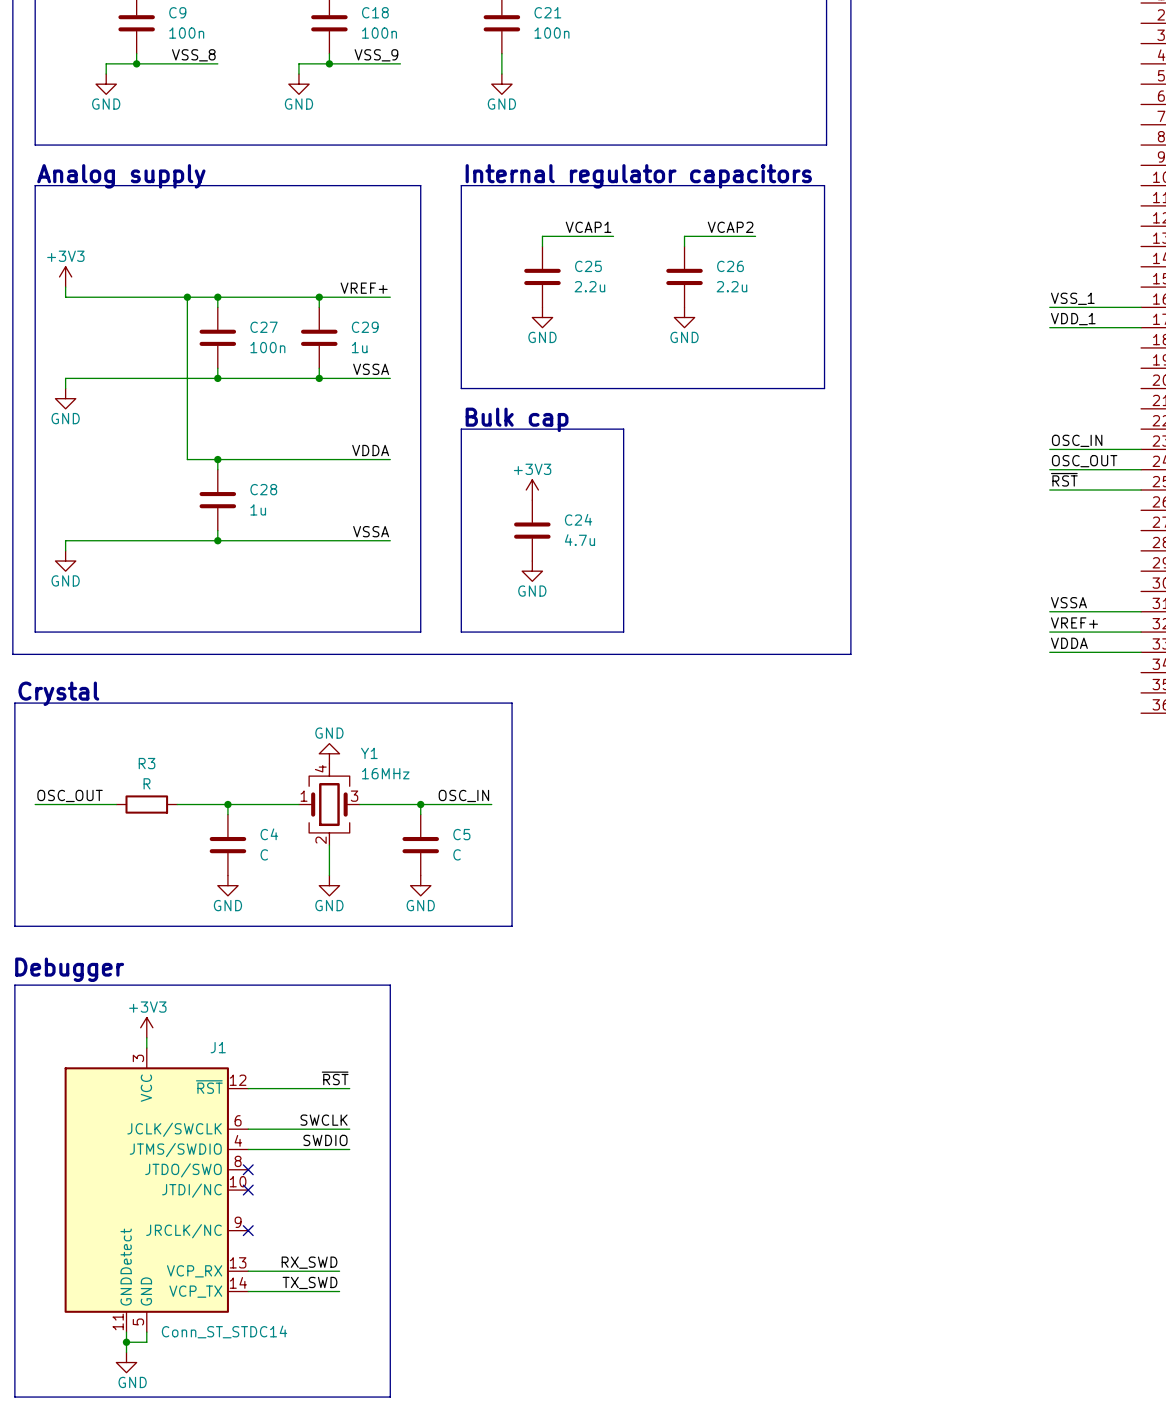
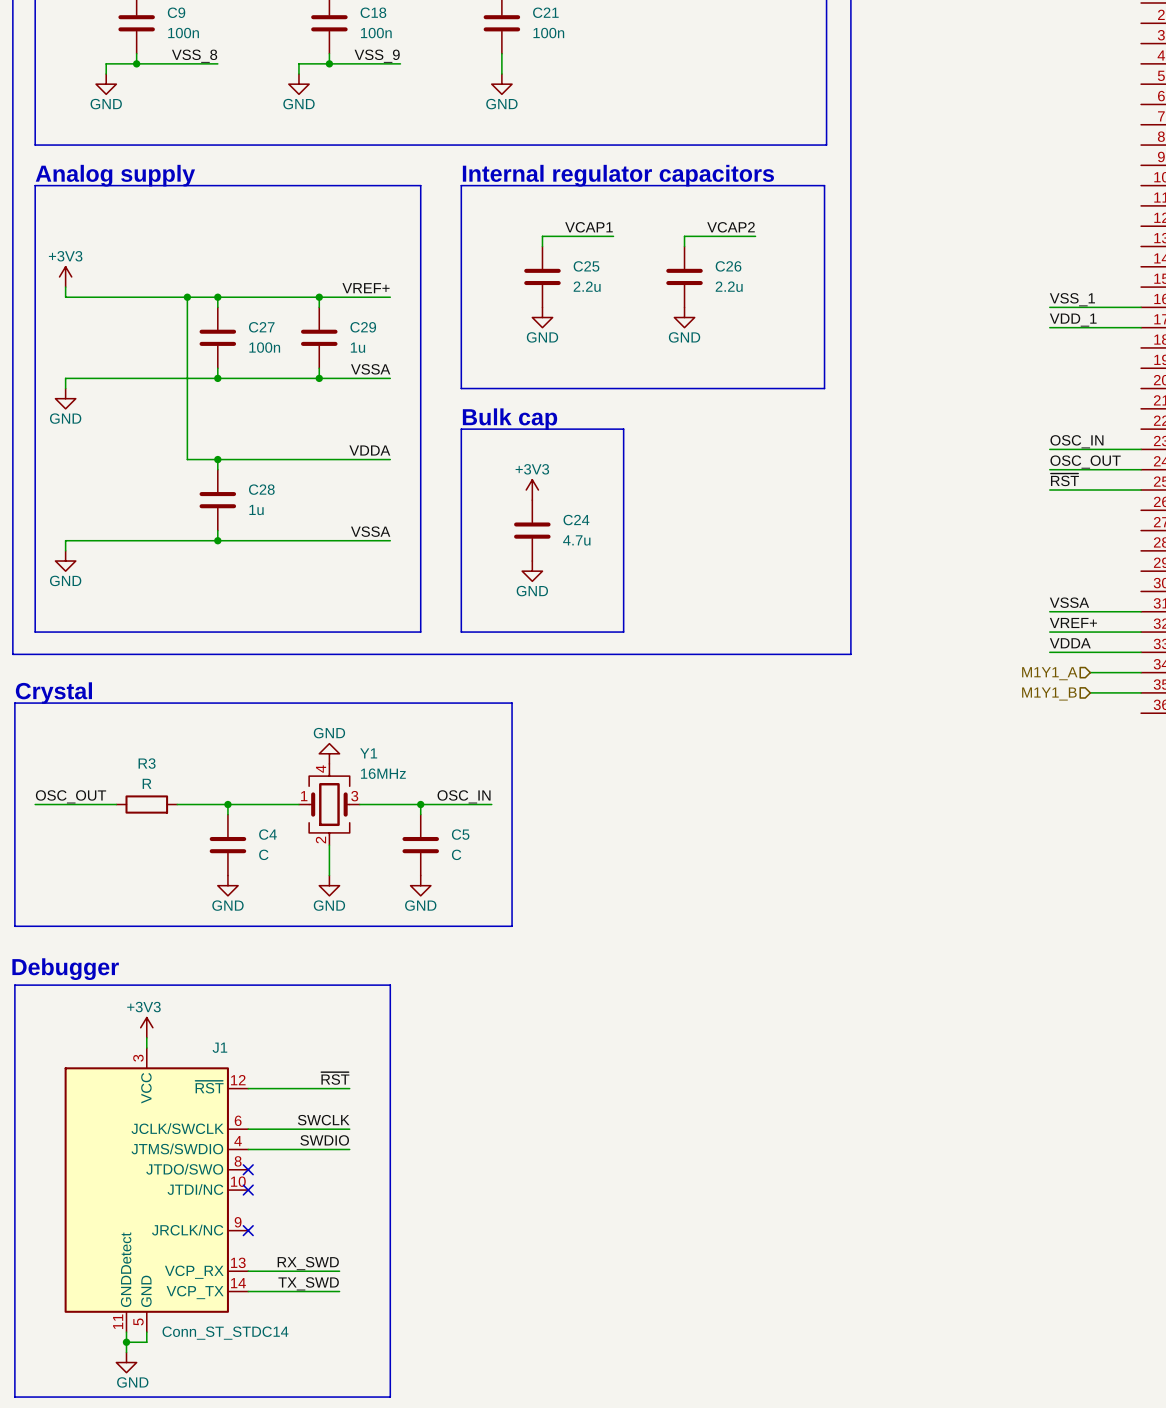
hierarchical label: none -> M1Y1_A (1049, 673)
wire: none -> (1090, 672) (1141, 672)
wire: none -> (1090, 692) (1141, 692)
hierarchical label: none -> M1Y1_B (1049, 694)

